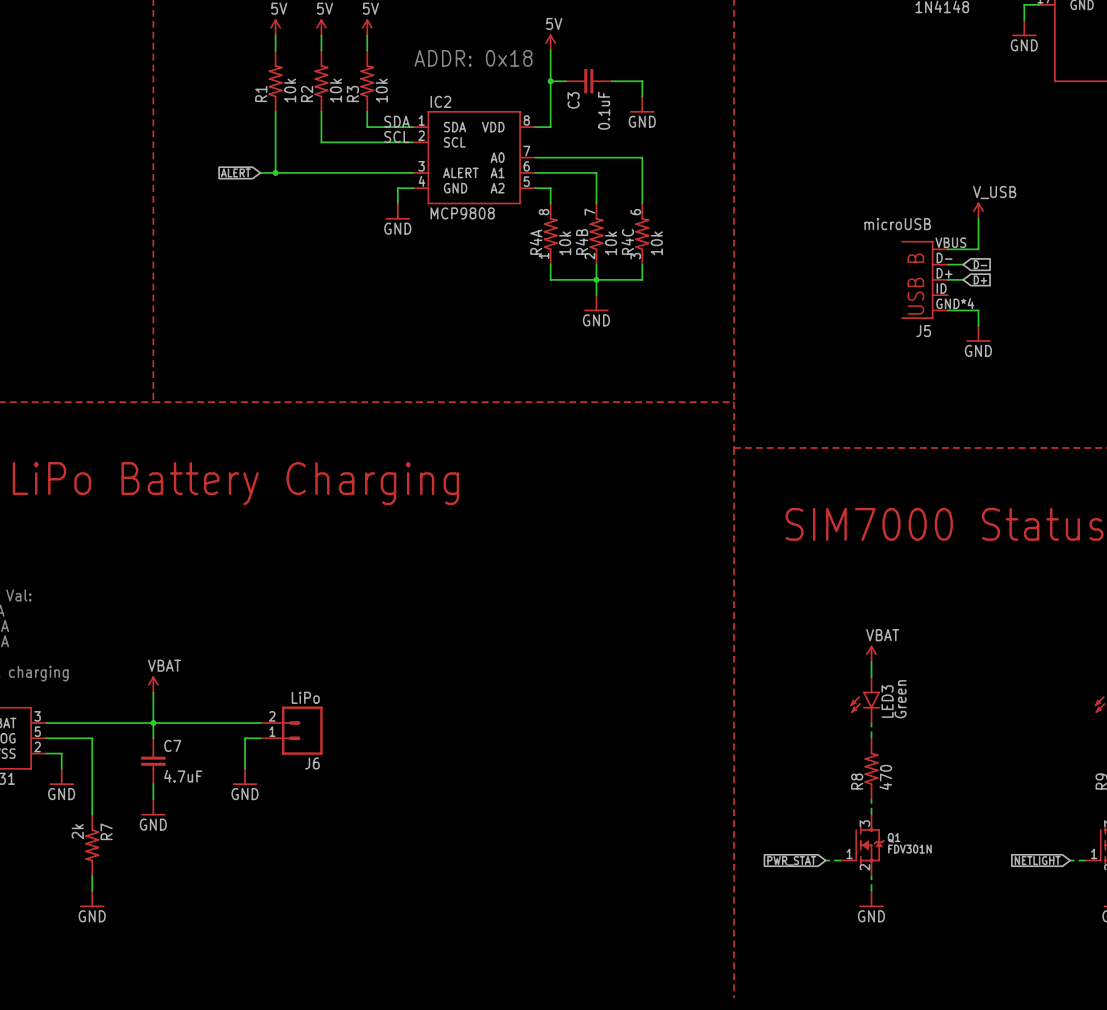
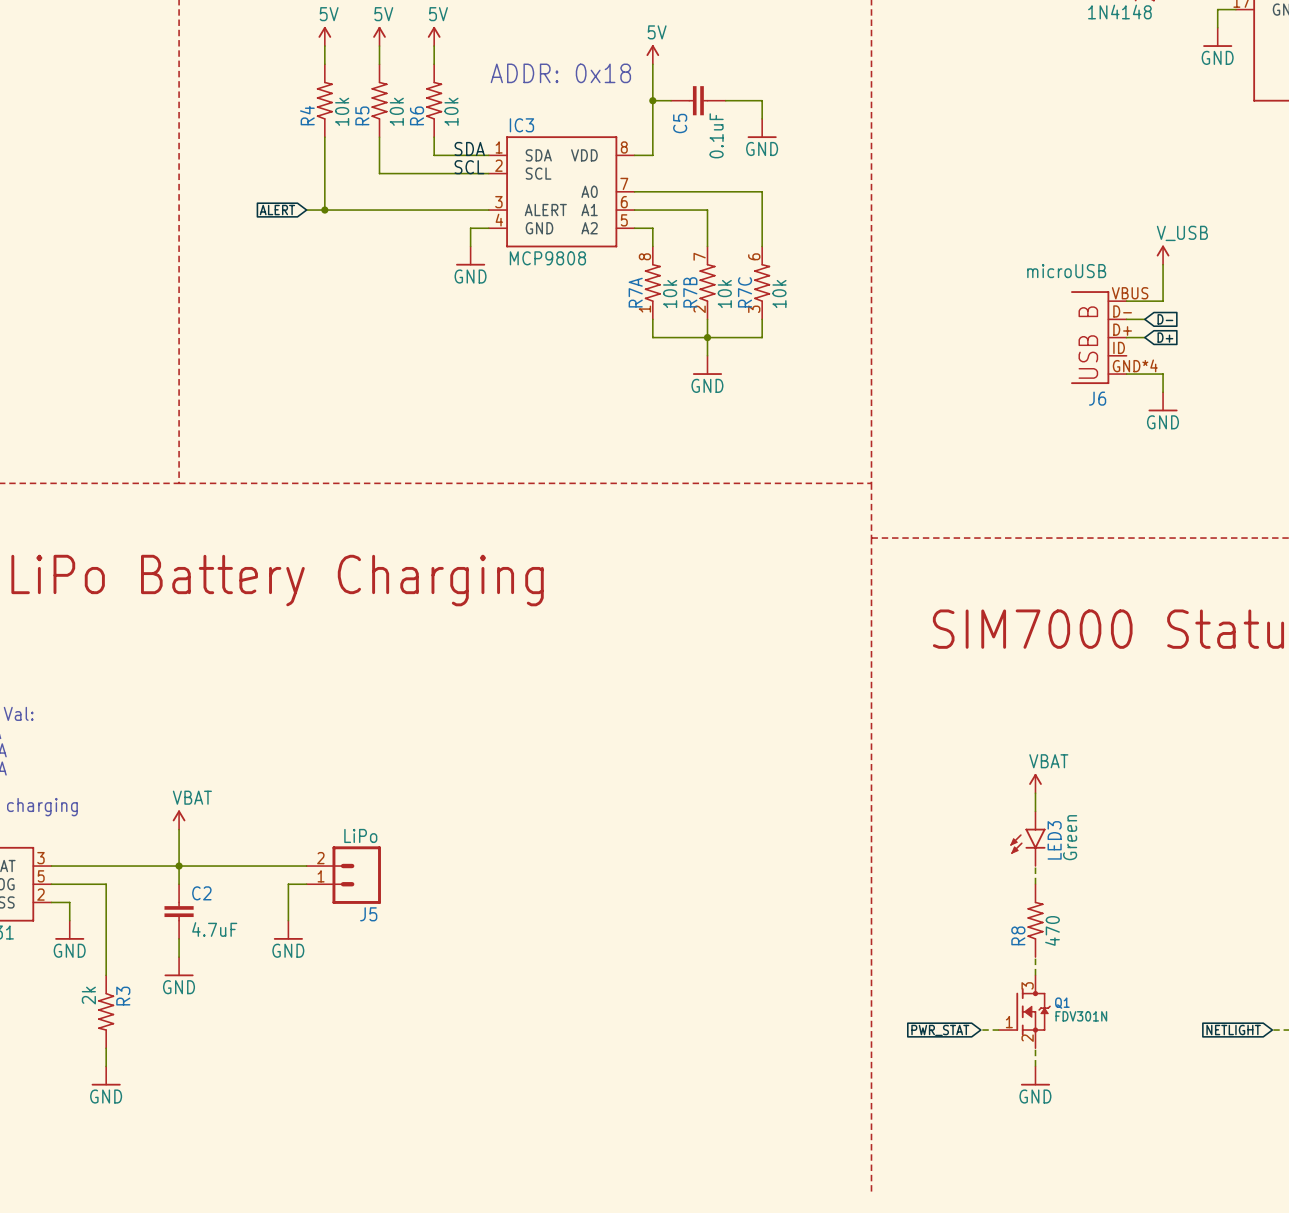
R1 name: R1 (261, 93) -> R4 (307, 115)
R2 name: R2 (307, 93) -> R5 (362, 115)
R3 name: R3 (352, 93) -> R6 (417, 115)
C3 name: C3 (573, 100) -> C5 (680, 123)
IC2 name: IC2 (440, 101) -> IC3 (521, 125)
R4B name: R4B (581, 241) -> R7B (690, 292)
R4C name: R4C (627, 241) -> R7C (745, 292)
R4A name: R4A (536, 242) -> R7A (635, 292)
J5 name: J5 (923, 331) -> J6 (1097, 398)
C7 name: C7 (172, 745) -> C2 (201, 893)
J6 name: J6 (312, 763) -> J5 (368, 914)
R7 name: R7 (106, 831) -> R3 (123, 996)

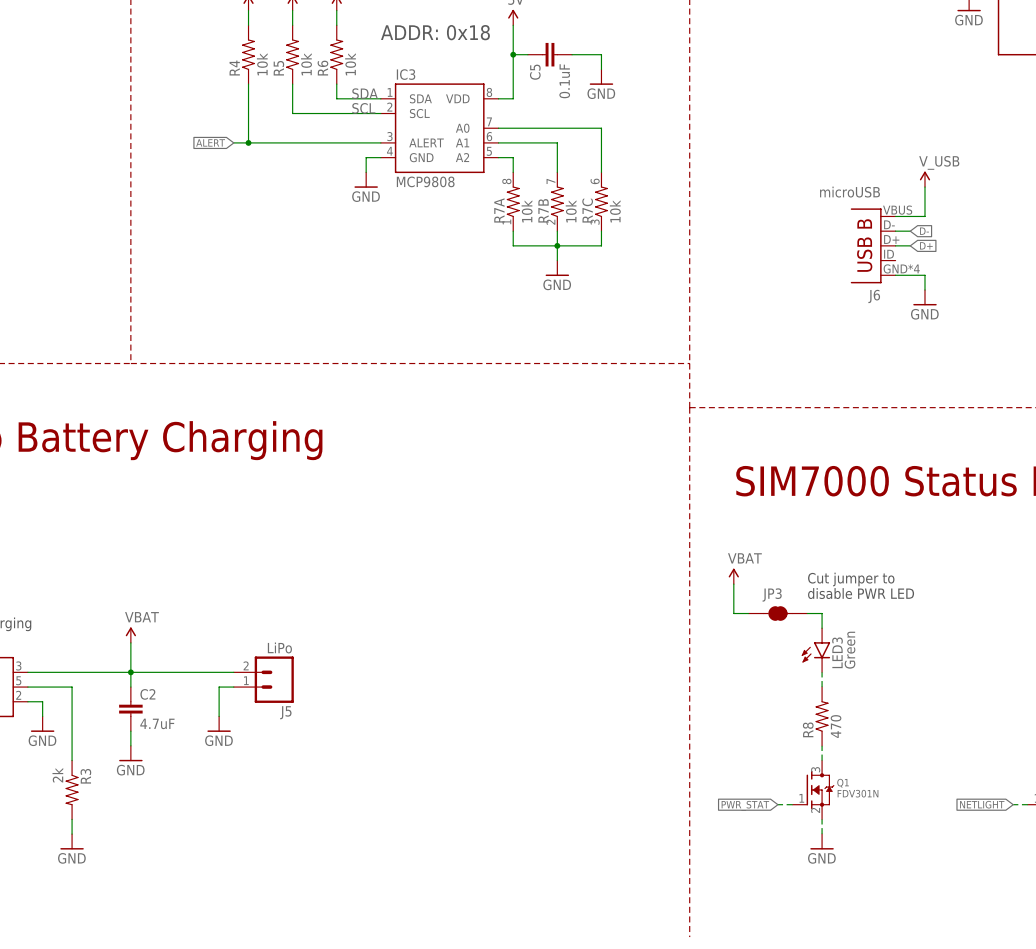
text: none -> Cut jumper to (851, 579)
wire: none -> (733, 584) (733, 613) (748, 613)
text: none -> disable PWR LED (861, 593)
power symbol position: VBAT (1035, 783) -> VBAT (733, 576)
JP3: none -> (777, 613)
wire: none -> (807, 613) (822, 613)

